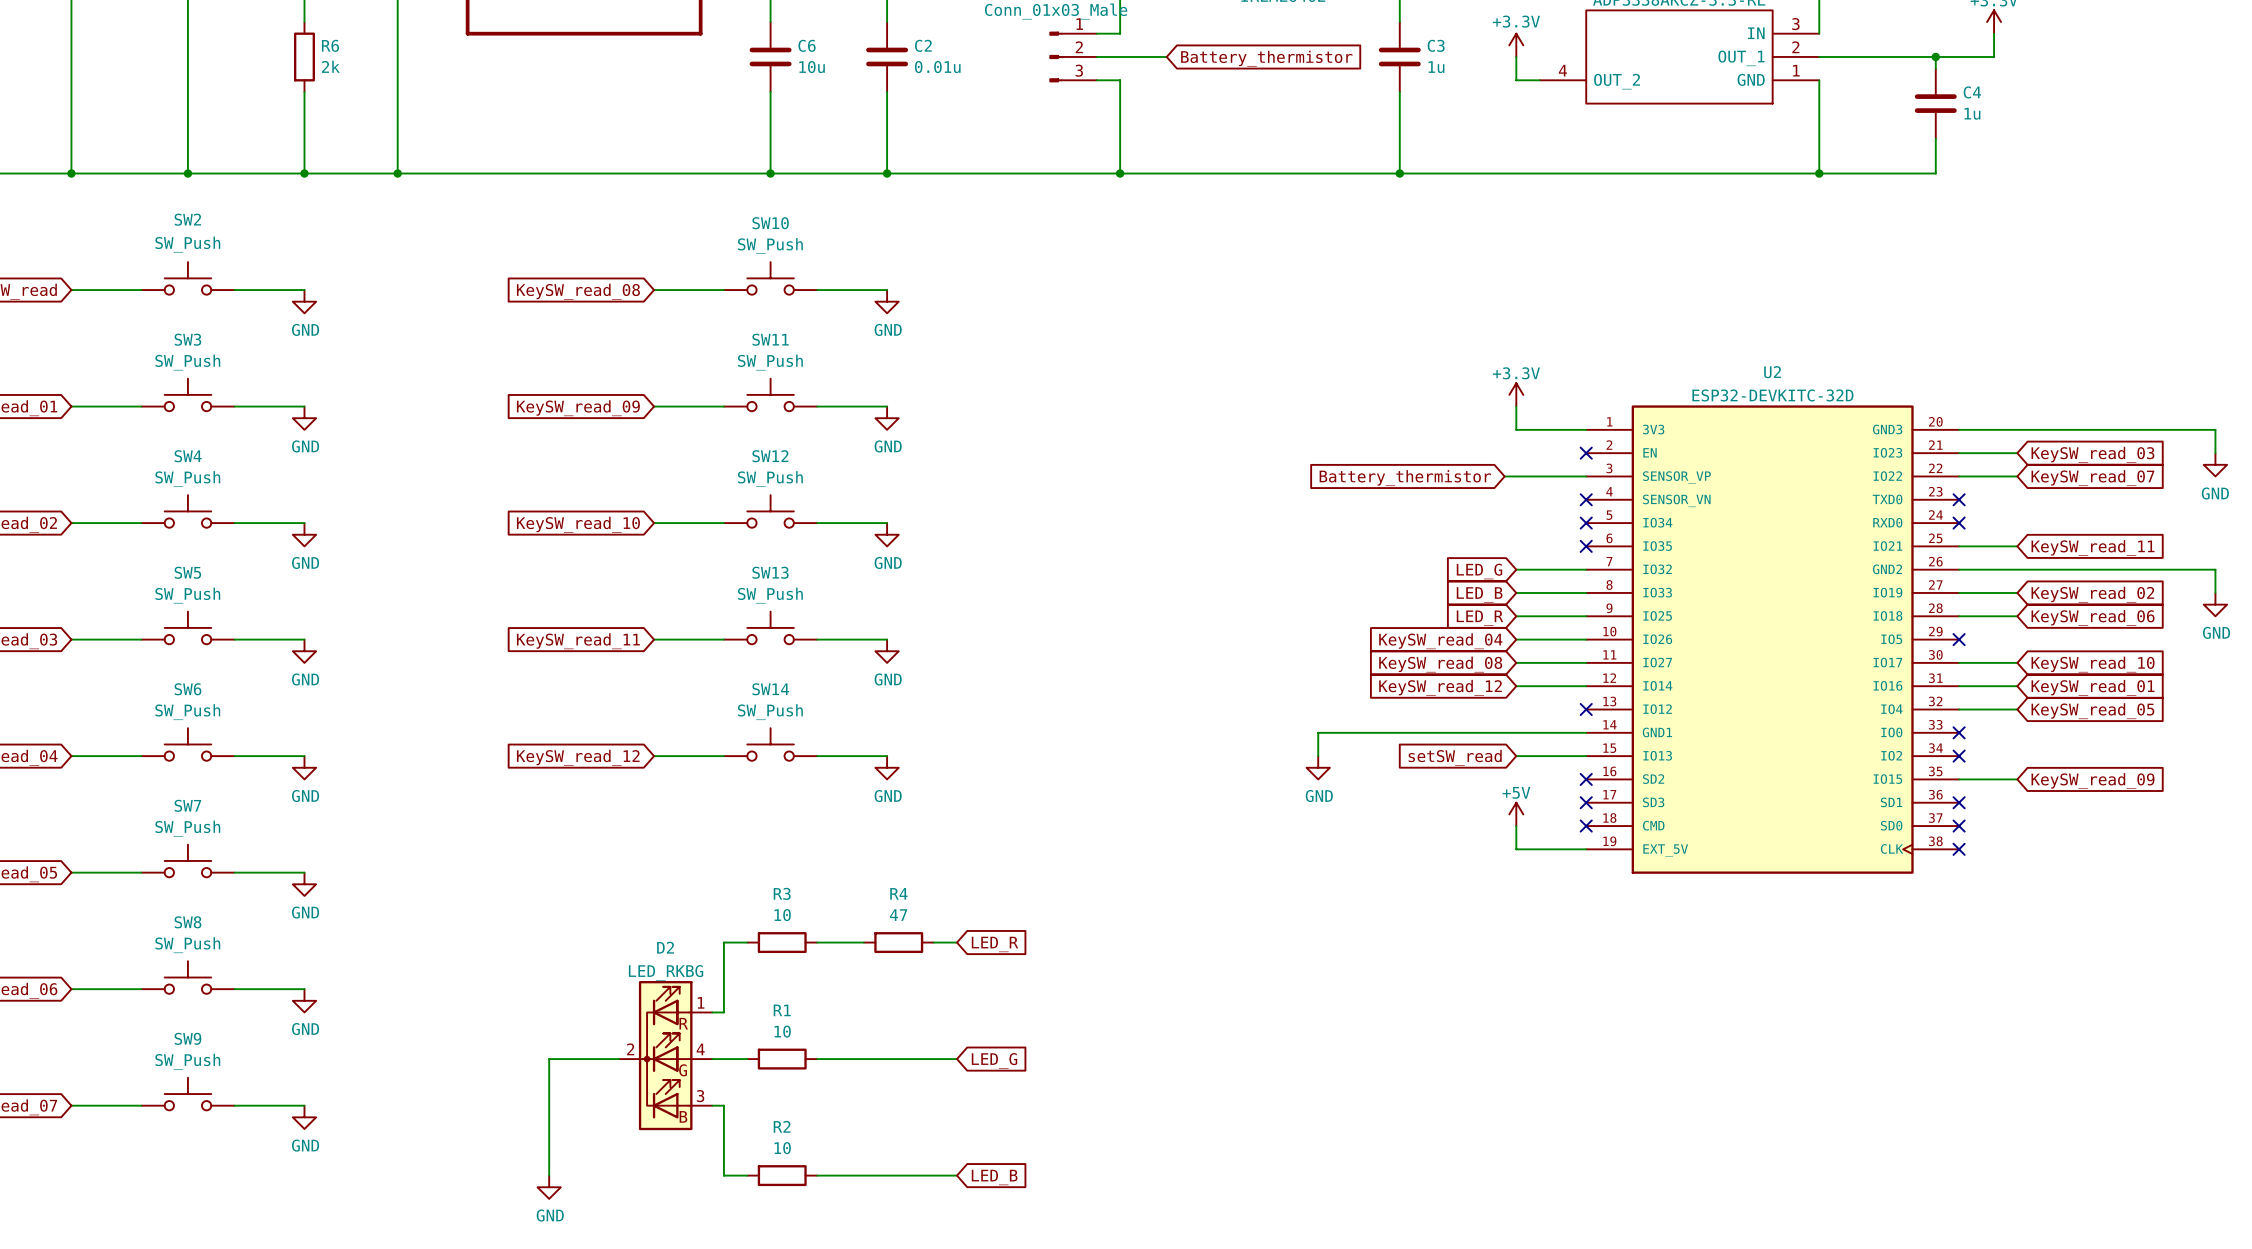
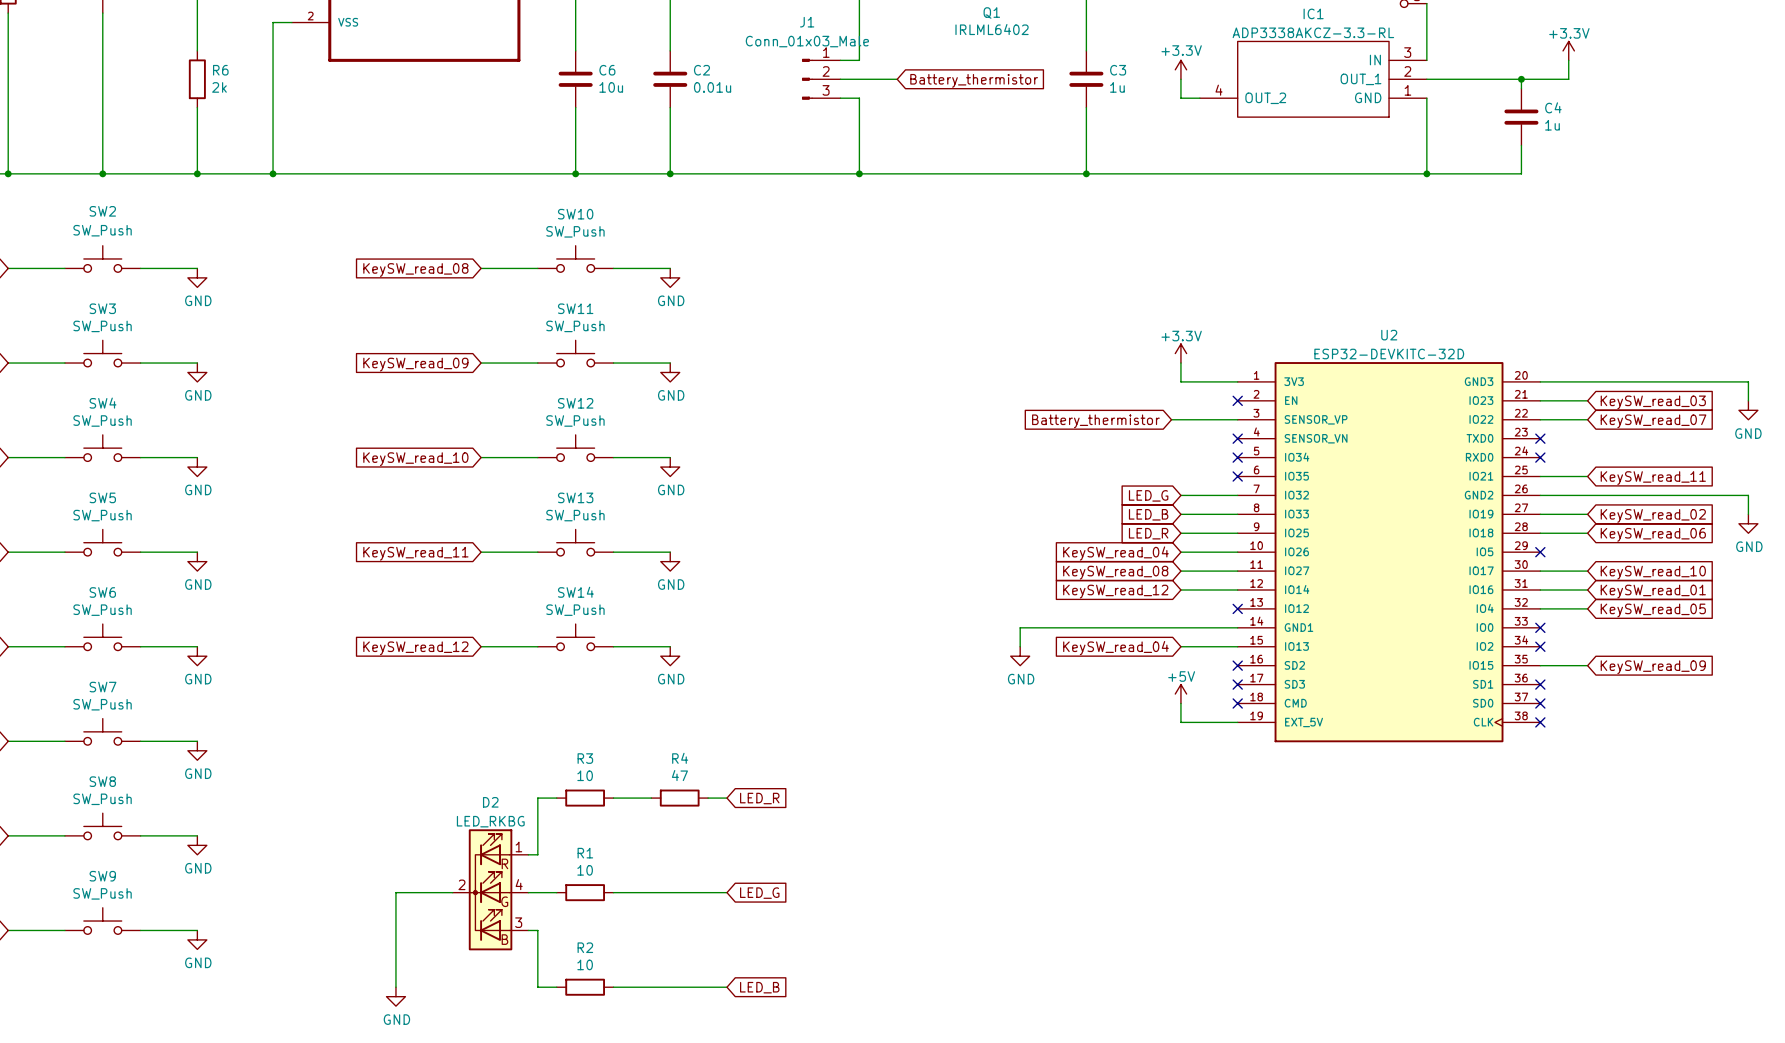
global label: setSW_read (1455, 757) -> KeySW_read_04 (1115, 648)

